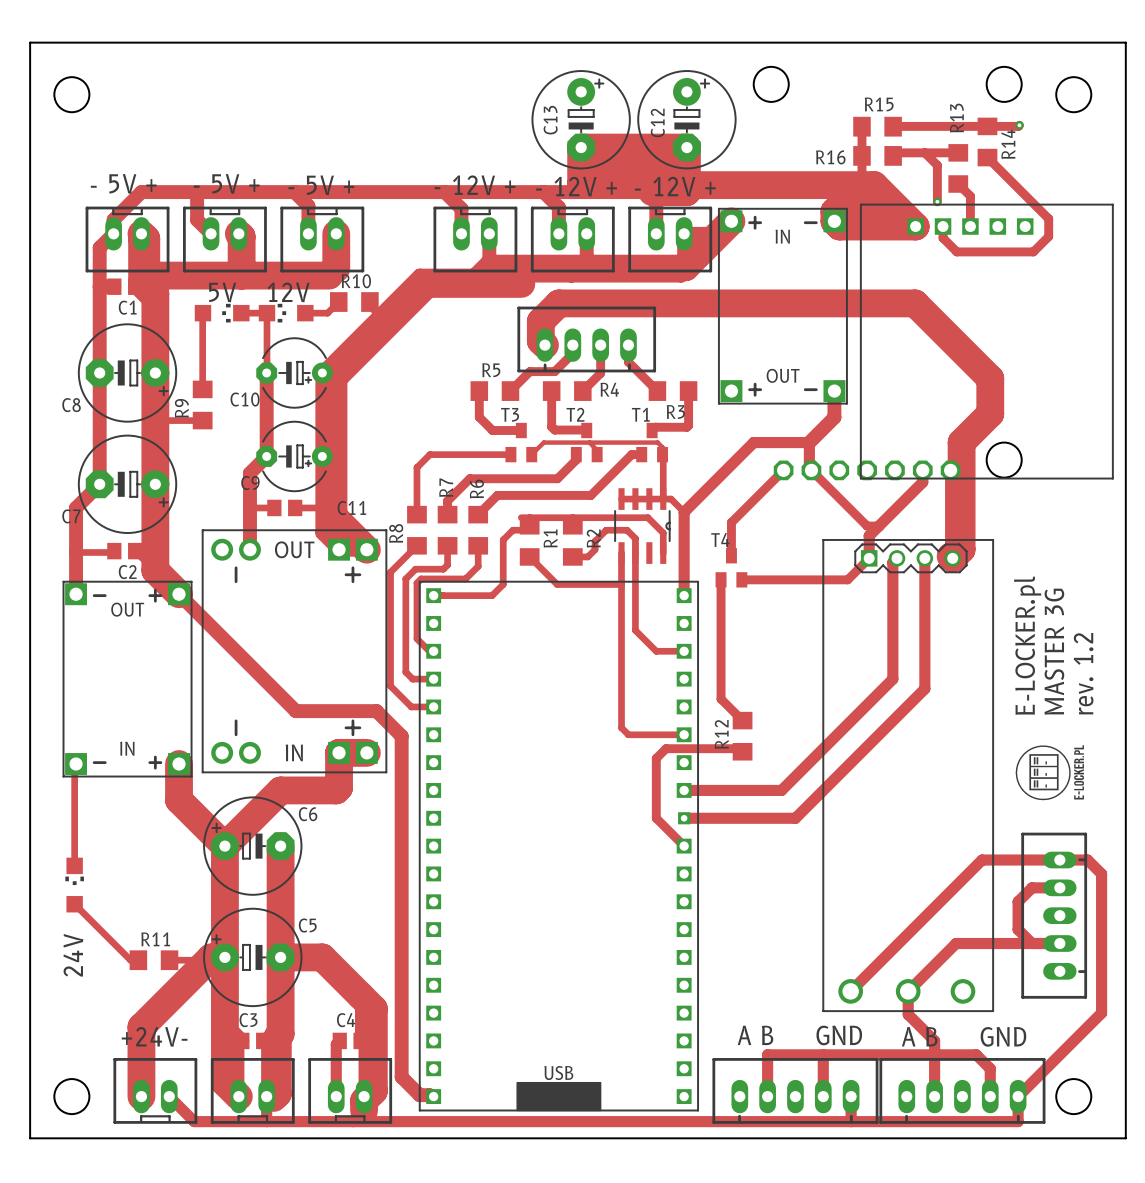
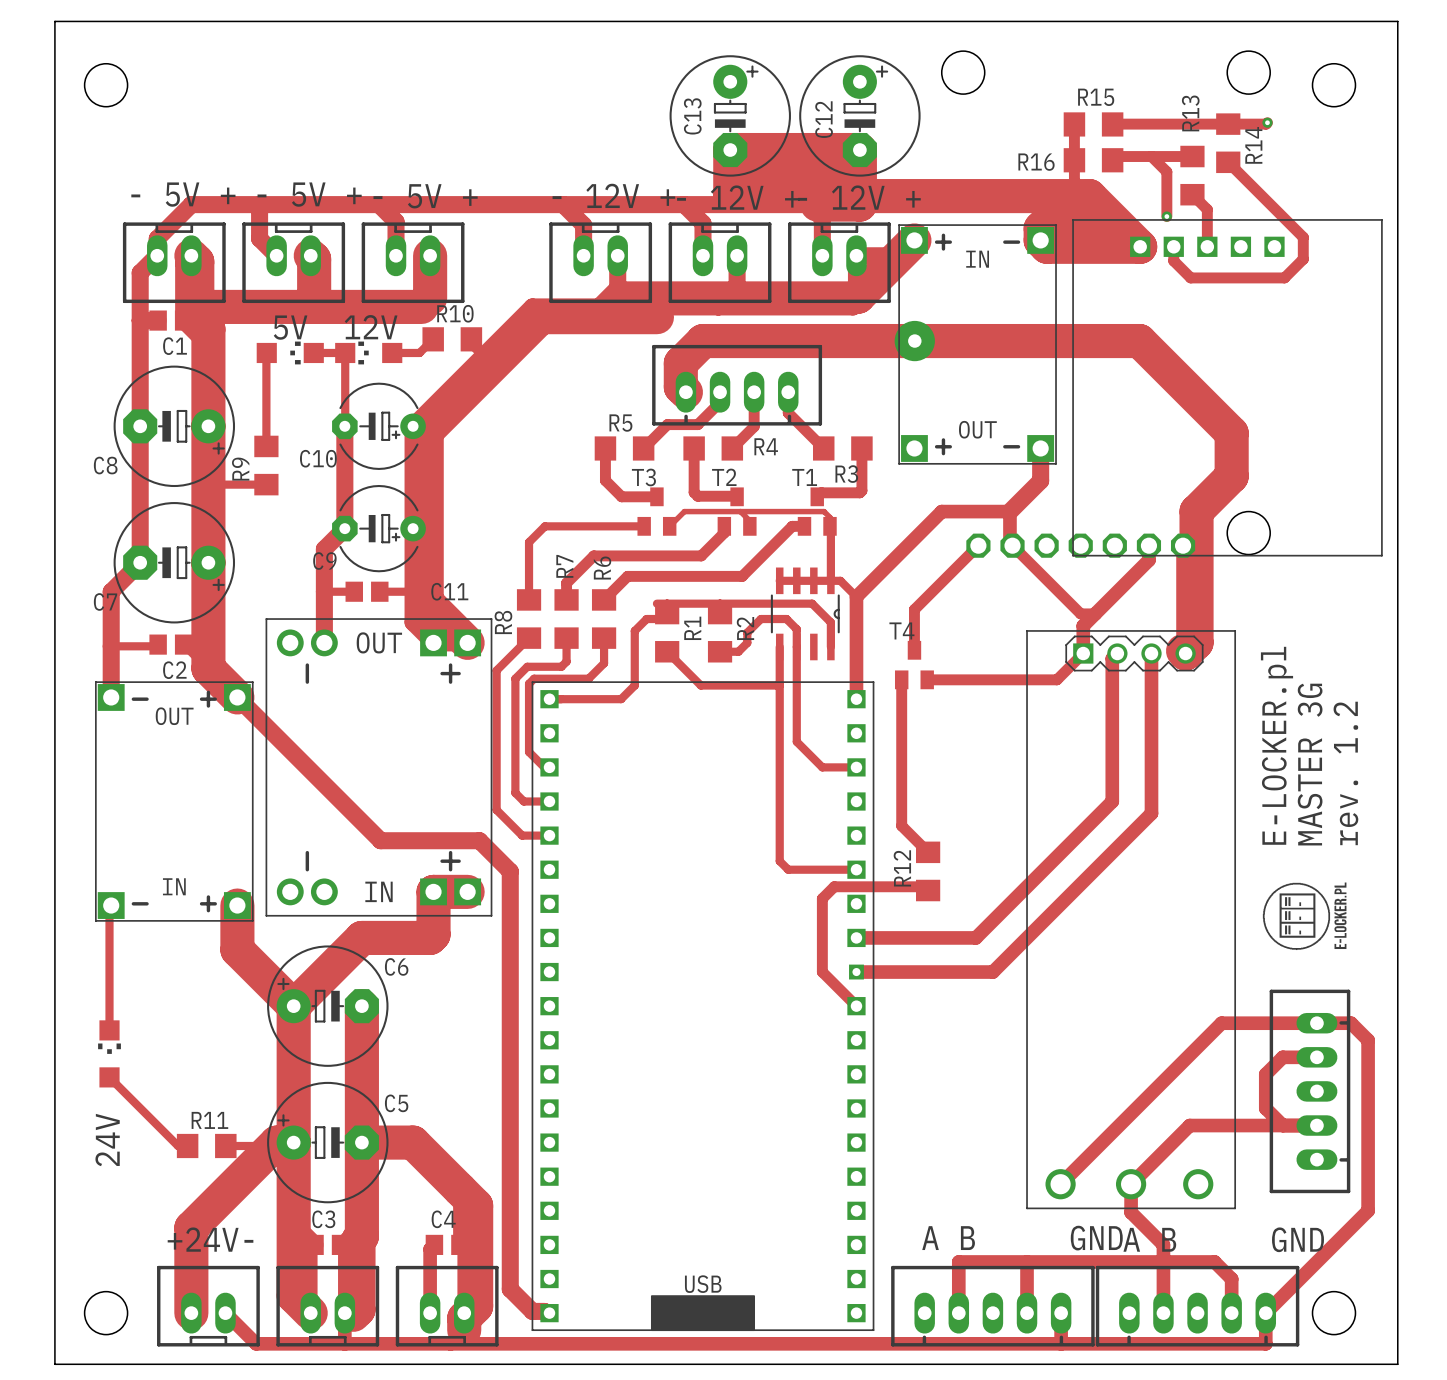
via: none -> (914, 341)

